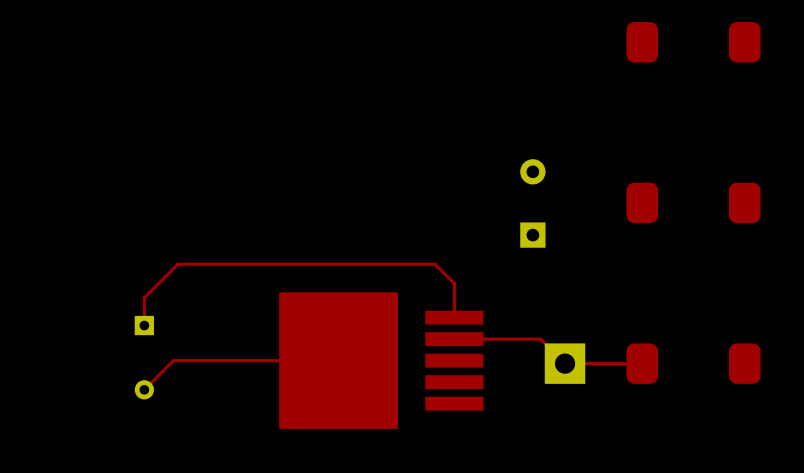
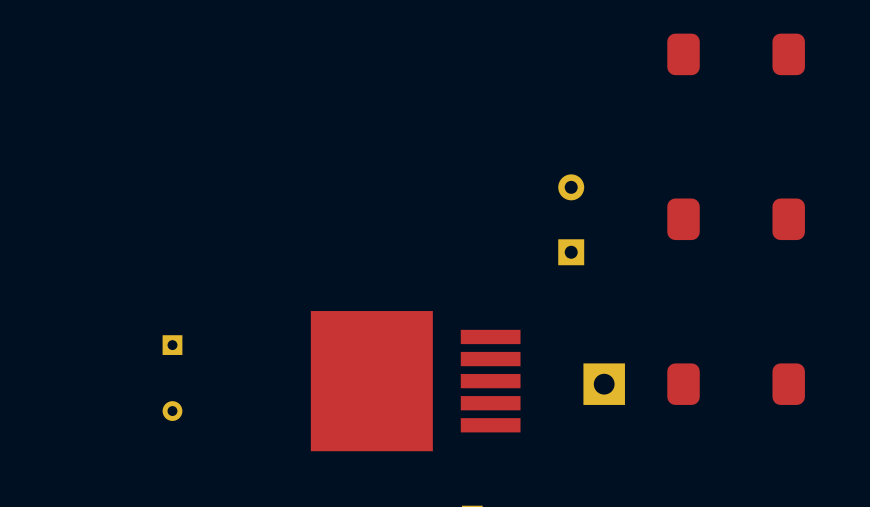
top track: (454, 317) (454, 283) (435, 264) (177, 264) (144, 297) (144, 325) -> none
top track: (454, 339) (540, 339) (565, 363) (642, 363) -> none
top track: (338, 360) (173, 360) (144, 389) -> none

